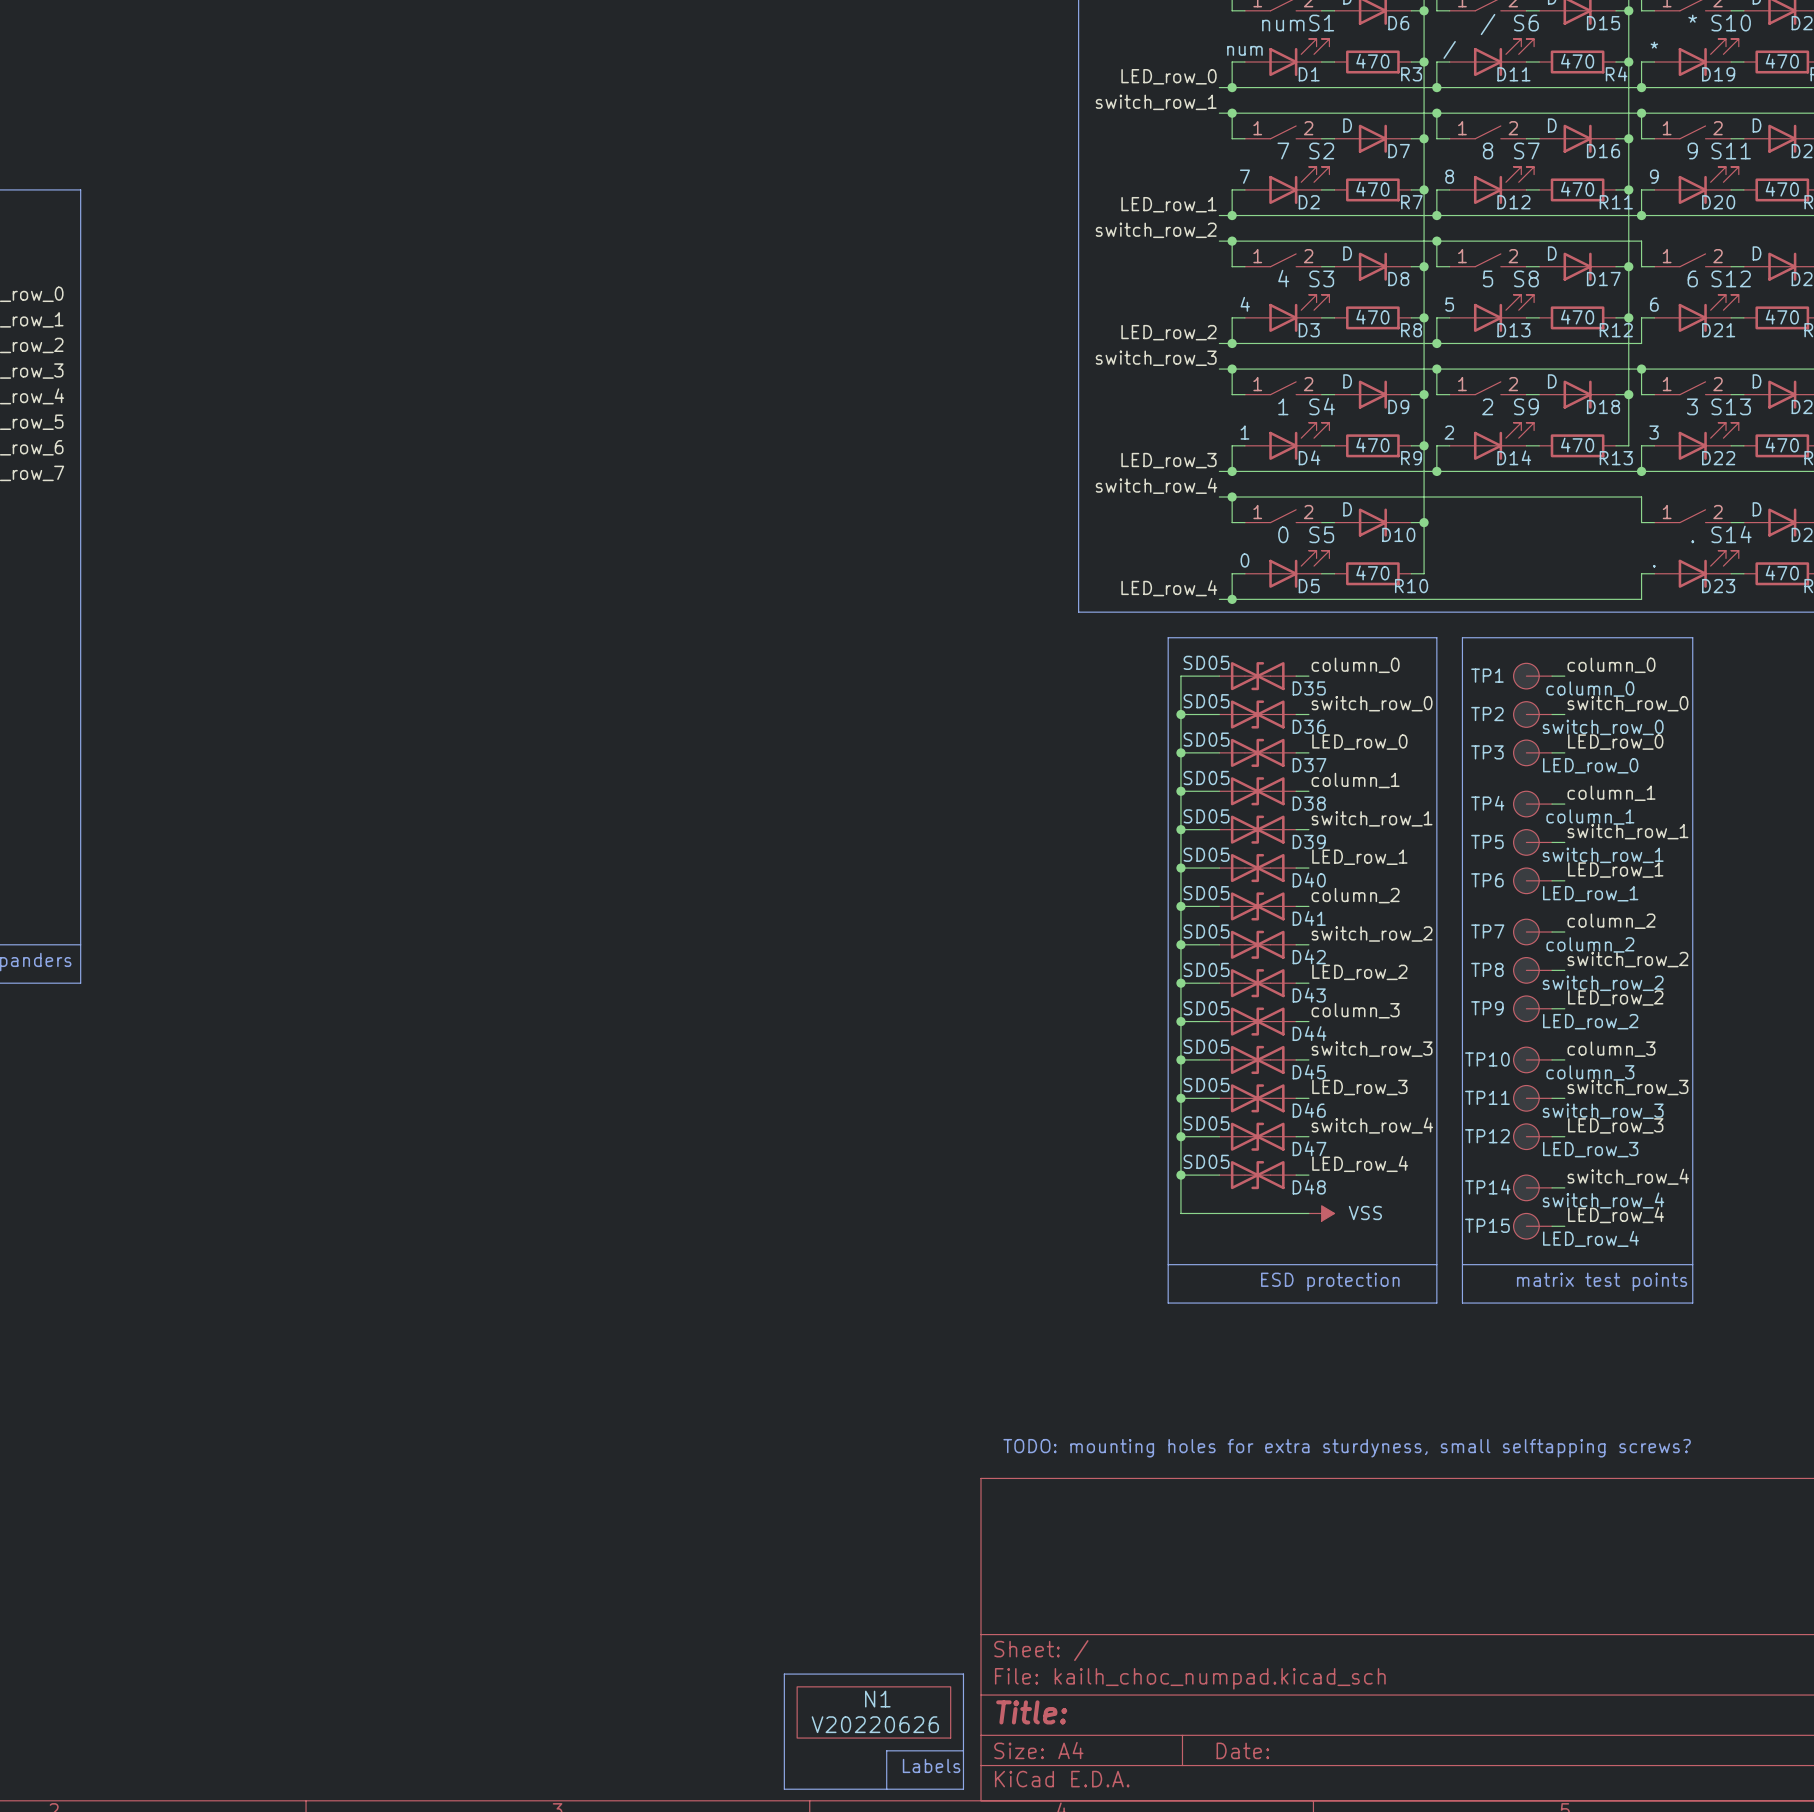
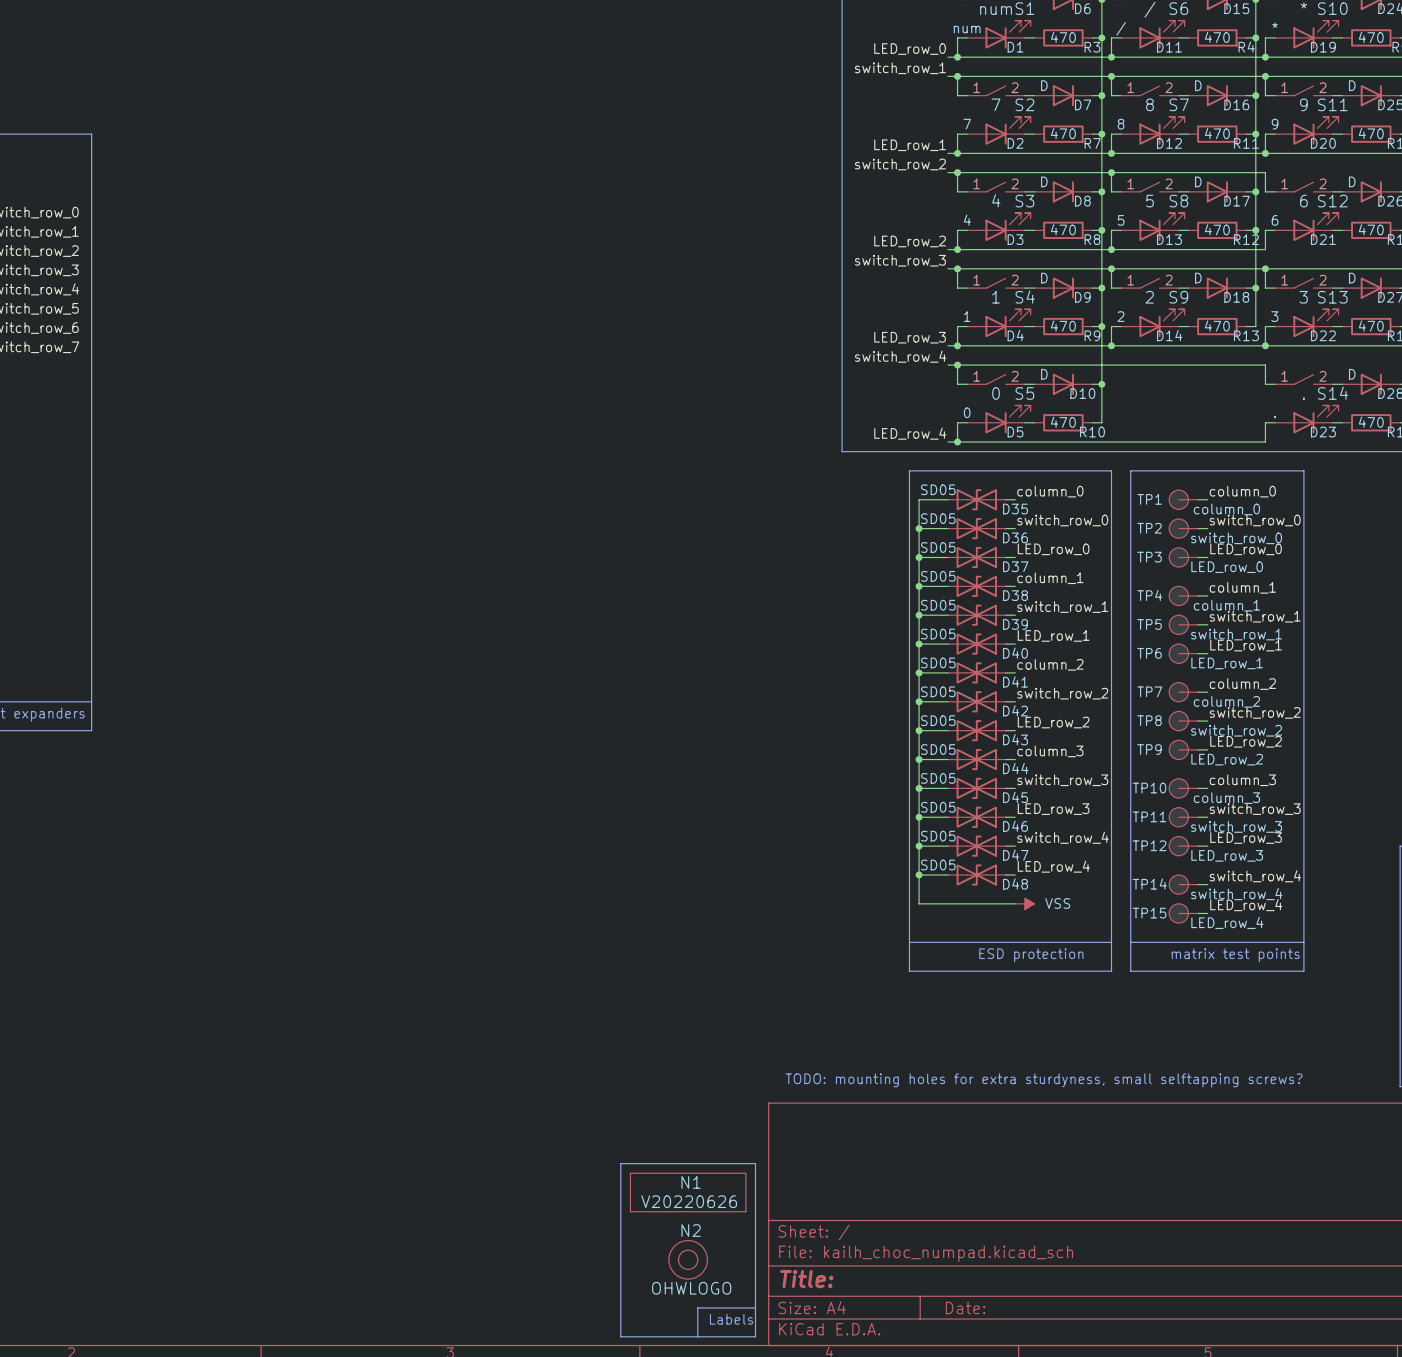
line: (784, 1674) (963, 1674) -> (620, 1250) (620, 1163) (755, 1163) (755, 1250)
N2: none -> OHWLOGO (688, 1259)
N1 position: (873, 1712) -> (688, 1192)

